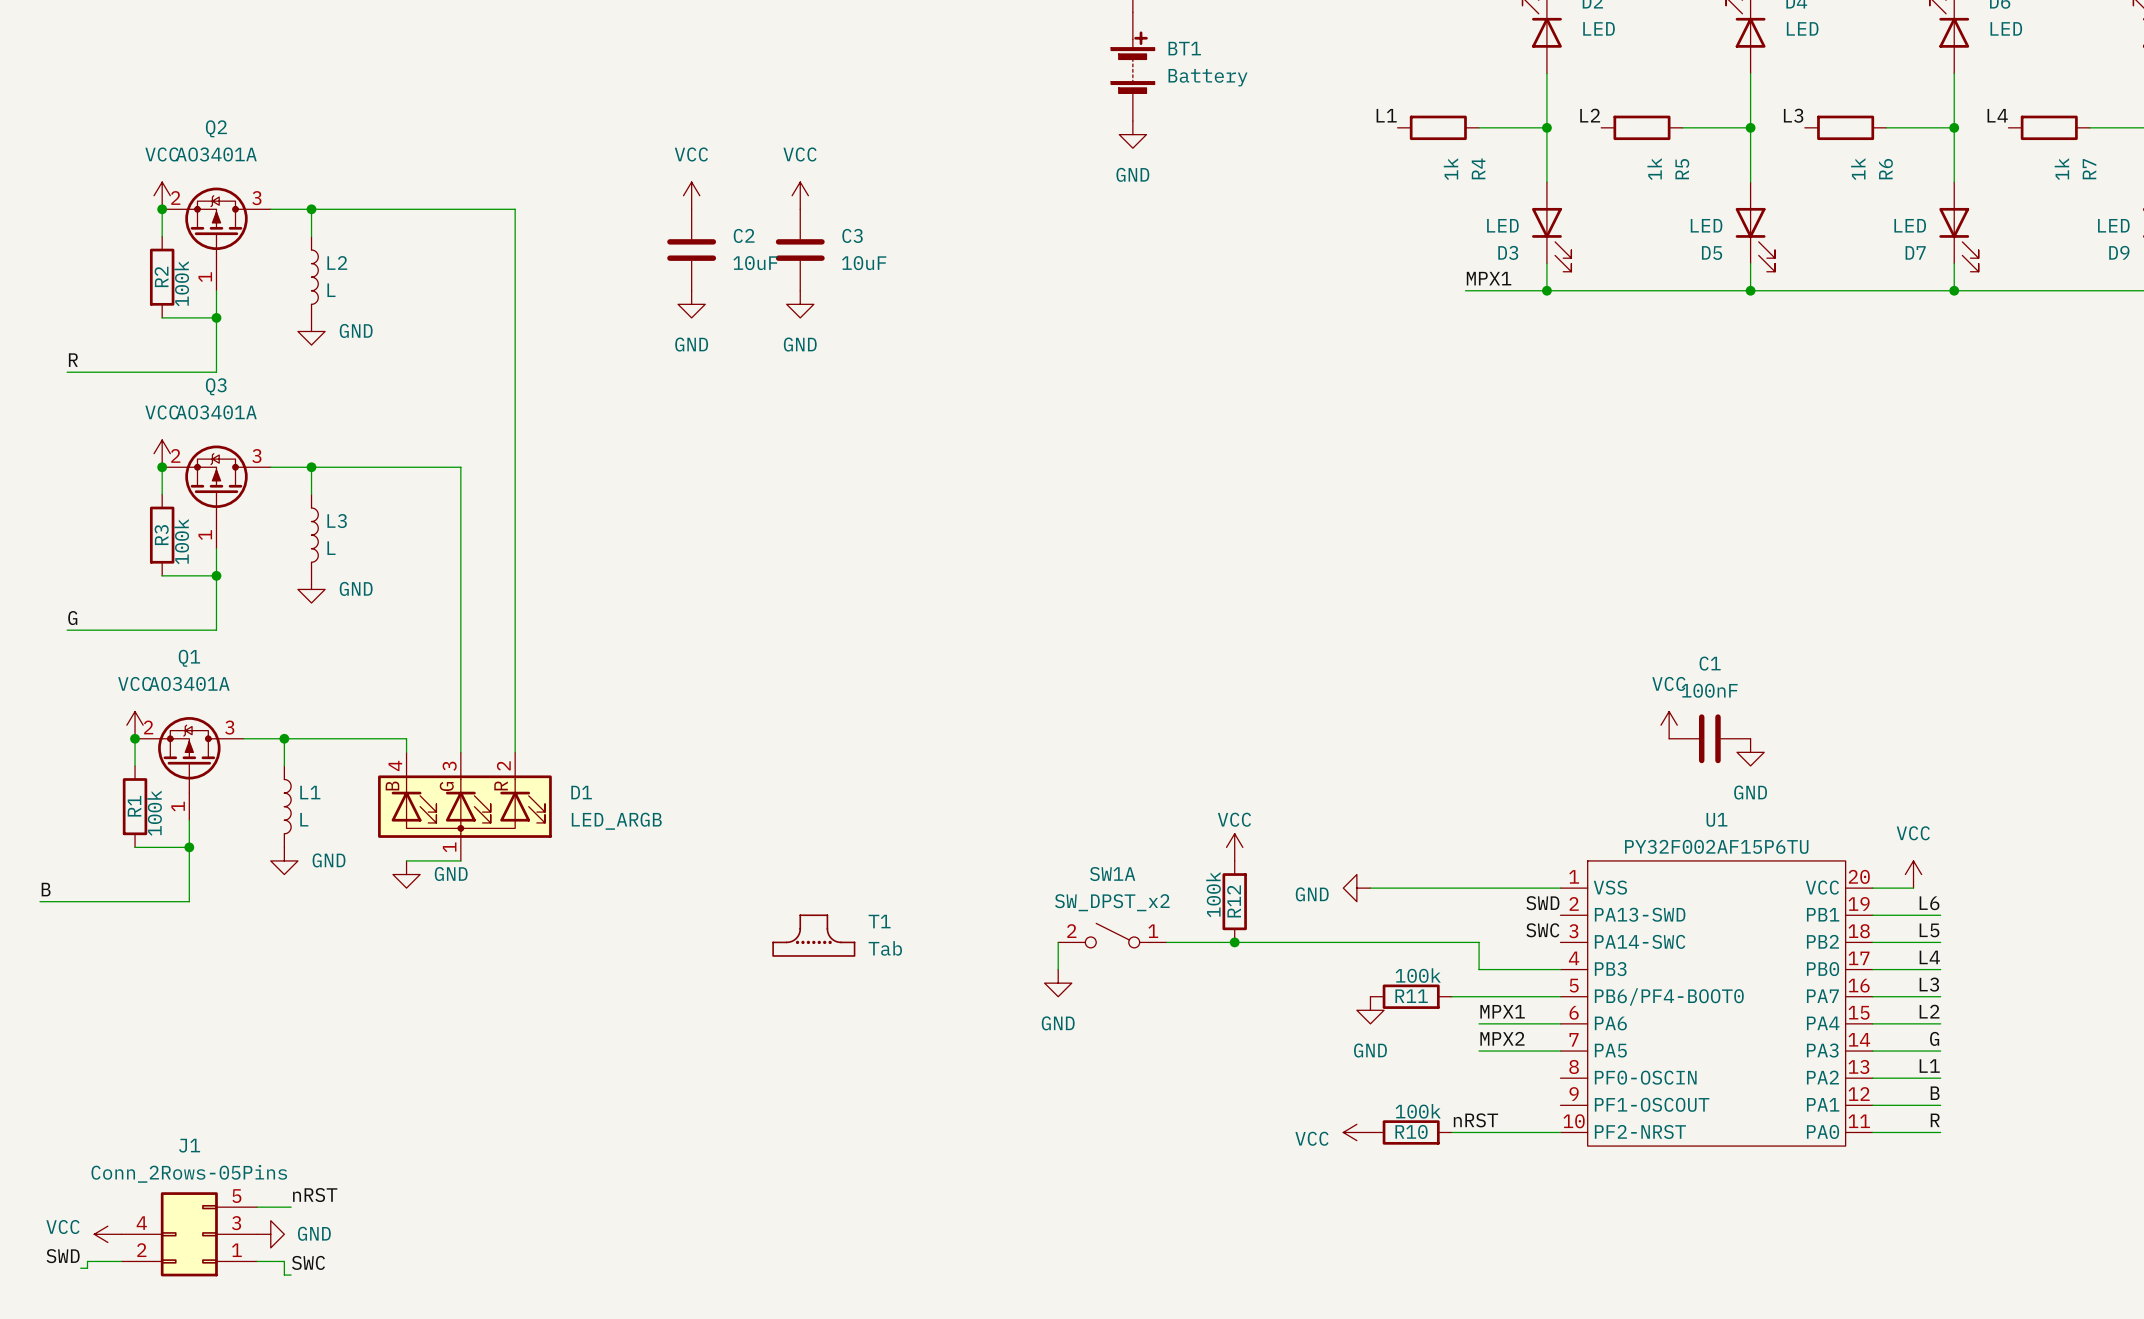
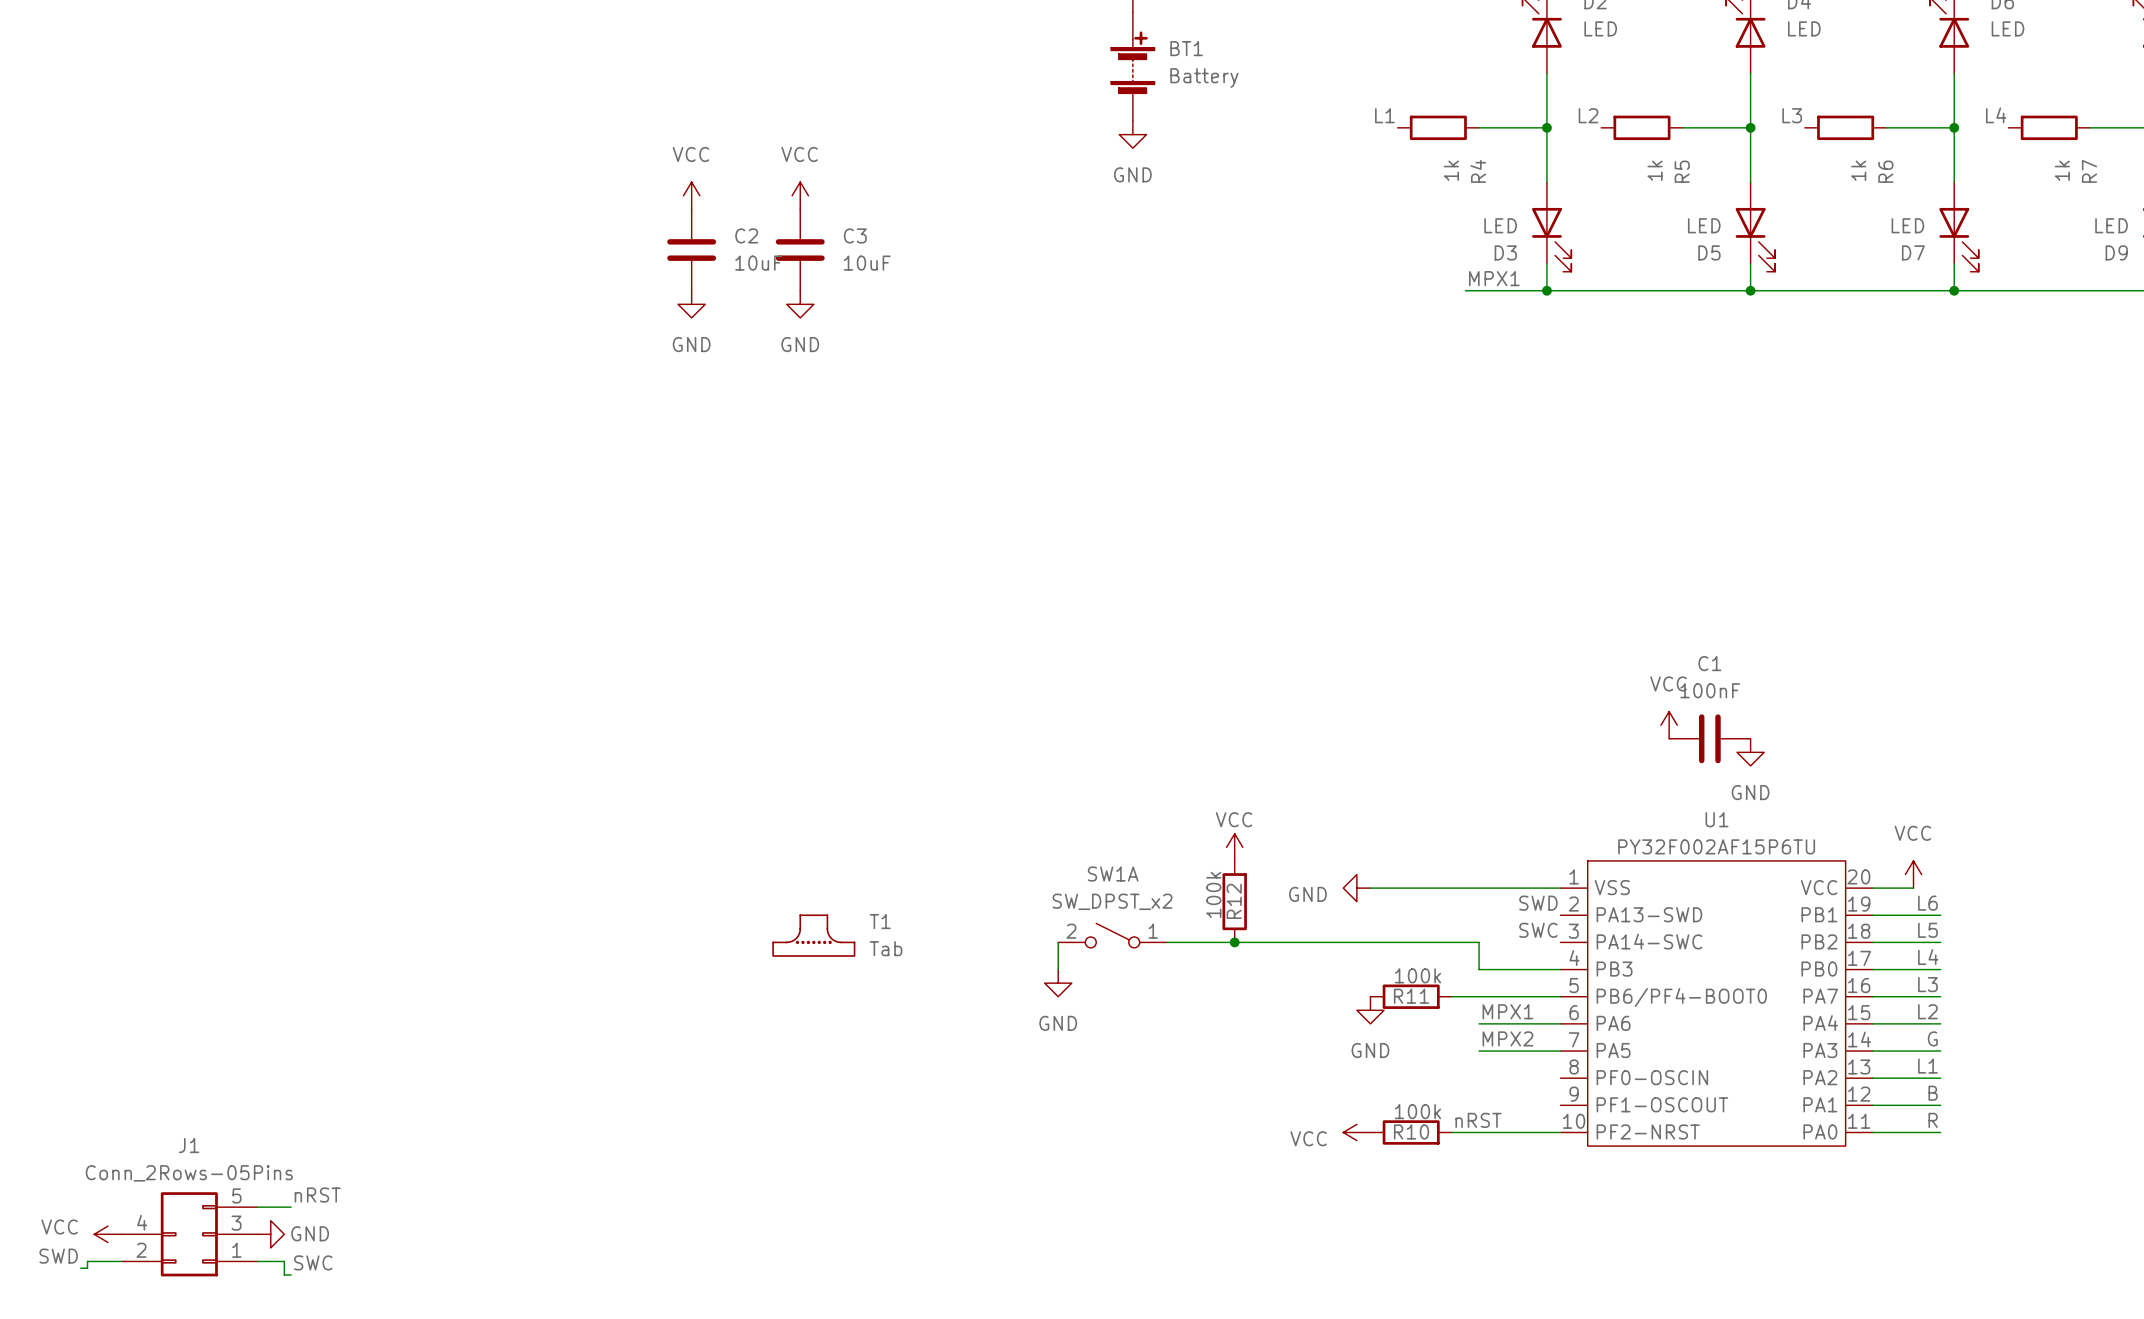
power symbol: VCC (162, 195) -> none
wire: (162, 209) (162, 236) -> none
junction: (162, 209) -> none
wire: (270, 209) (515, 209) (515, 752) -> none
wire: (311, 209) (311, 236) -> none
junction: (311, 209) -> none
Q2: AO3401A (216, 239) -> none
R2: 100k (162, 277) -> none
L2: L (314, 277) -> none
wire: (216, 290) (216, 372) (67, 372) -> none
wire: (162, 317) (216, 317) -> none
junction: (216, 317) -> none
power symbol: GND (311, 331) -> none
label: R (73, 360) -> none
power symbol: VCC (162, 453) -> none
wire: (162, 467) (162, 494) -> none
junction: (162, 467) -> none
wire: (270, 467) (460, 467) (460, 752) -> none
wire: (311, 467) (311, 494) -> none
junction: (311, 467) -> none
Q3: AO3401A (216, 497) -> none
R3: 100k (162, 535) -> none
L3: L (314, 535) -> none
wire: (216, 548) (216, 630) (67, 630) -> none
wire: (162, 575) (216, 575) -> none
junction: (216, 575) -> none
power symbol: GND (311, 589) -> none
label: G (72, 618) -> none
power symbol: VCC (135, 725) -> none
wire: (135, 738) (135, 765) -> none
junction: (135, 738) -> none
wire: (243, 738) (406, 738) (406, 752) -> none
wire: (284, 738) (284, 765) -> none
junction: (284, 738) -> none
Q1: AO3401A (189, 768) -> none
R1: 100k (135, 806) -> none
L1: L (287, 806) -> none
D1: LED_ARGB (464, 806) -> none
wire: (189, 820) (189, 901) (39, 901) -> none
wire: (135, 847) (189, 847) -> none
junction: (189, 847) -> none
power symbol: GND (284, 860) -> none
wire: (406, 860) (460, 860) -> none
power symbol: GND (406, 874) -> none
label: B (46, 889) -> none

